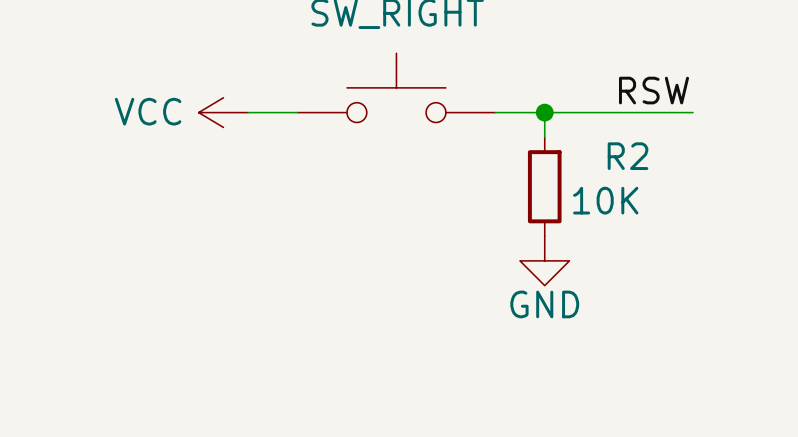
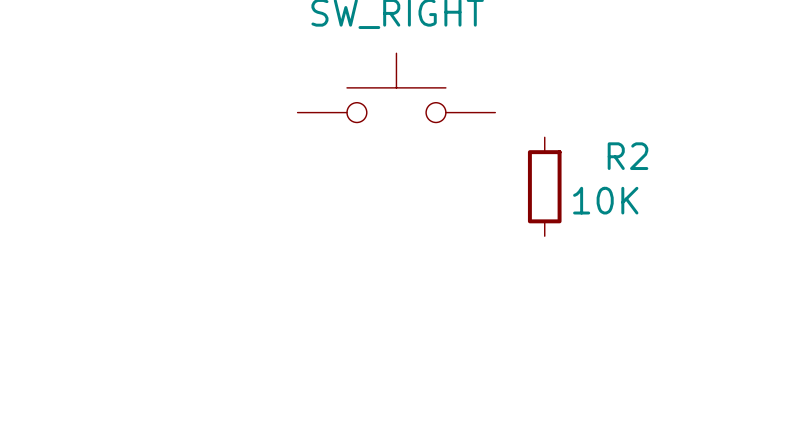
label: RSW (654, 90) -> none
power symbol: VCC (223, 112) -> none
wire: (248, 112) (297, 112) -> none
wire: (495, 112) (693, 112) -> none
wire: (544, 112) (544, 137) -> none
junction: (544, 112) -> none
power symbol: GND (544, 260) -> none

